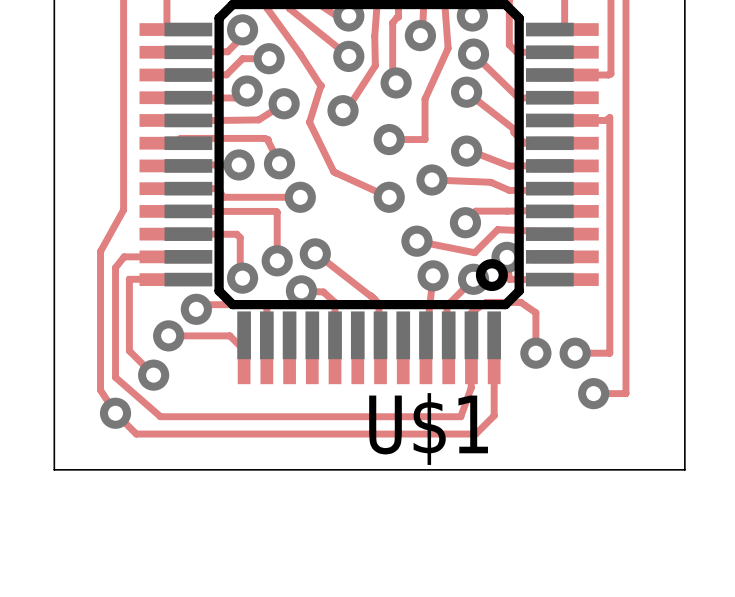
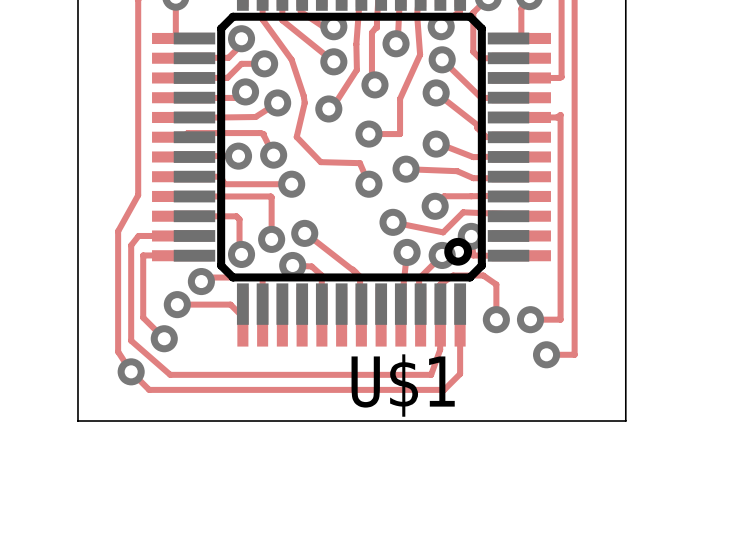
track: (300, 54) (321, 85) (309, 122) (333, 171) (389, 197) -> (291, 59) (304, 102) (296, 137) (320, 162) (359, 163) (368, 184)

